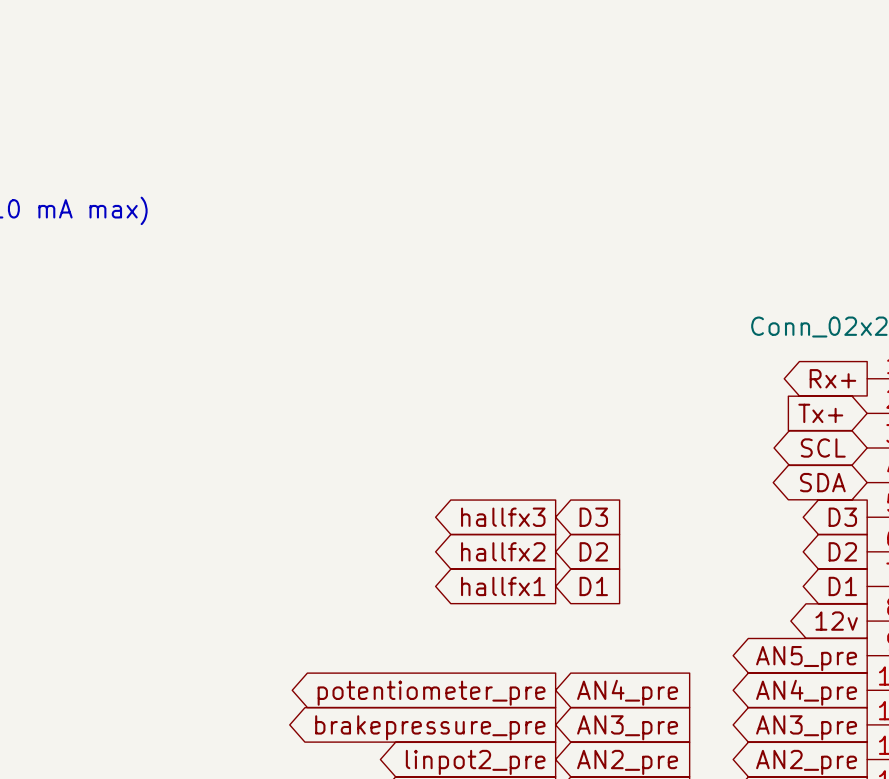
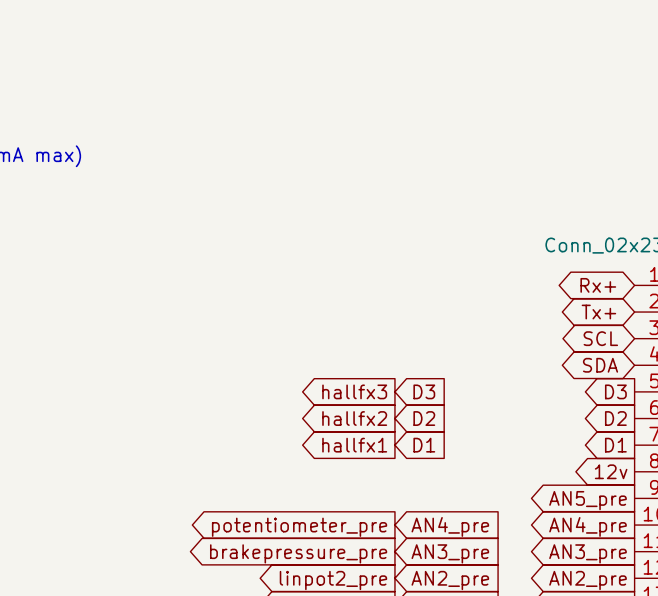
global label shape: output (832, 378) -> bidirectional (598, 285)
global label shape: input (820, 413) -> bidirectional (598, 312)

